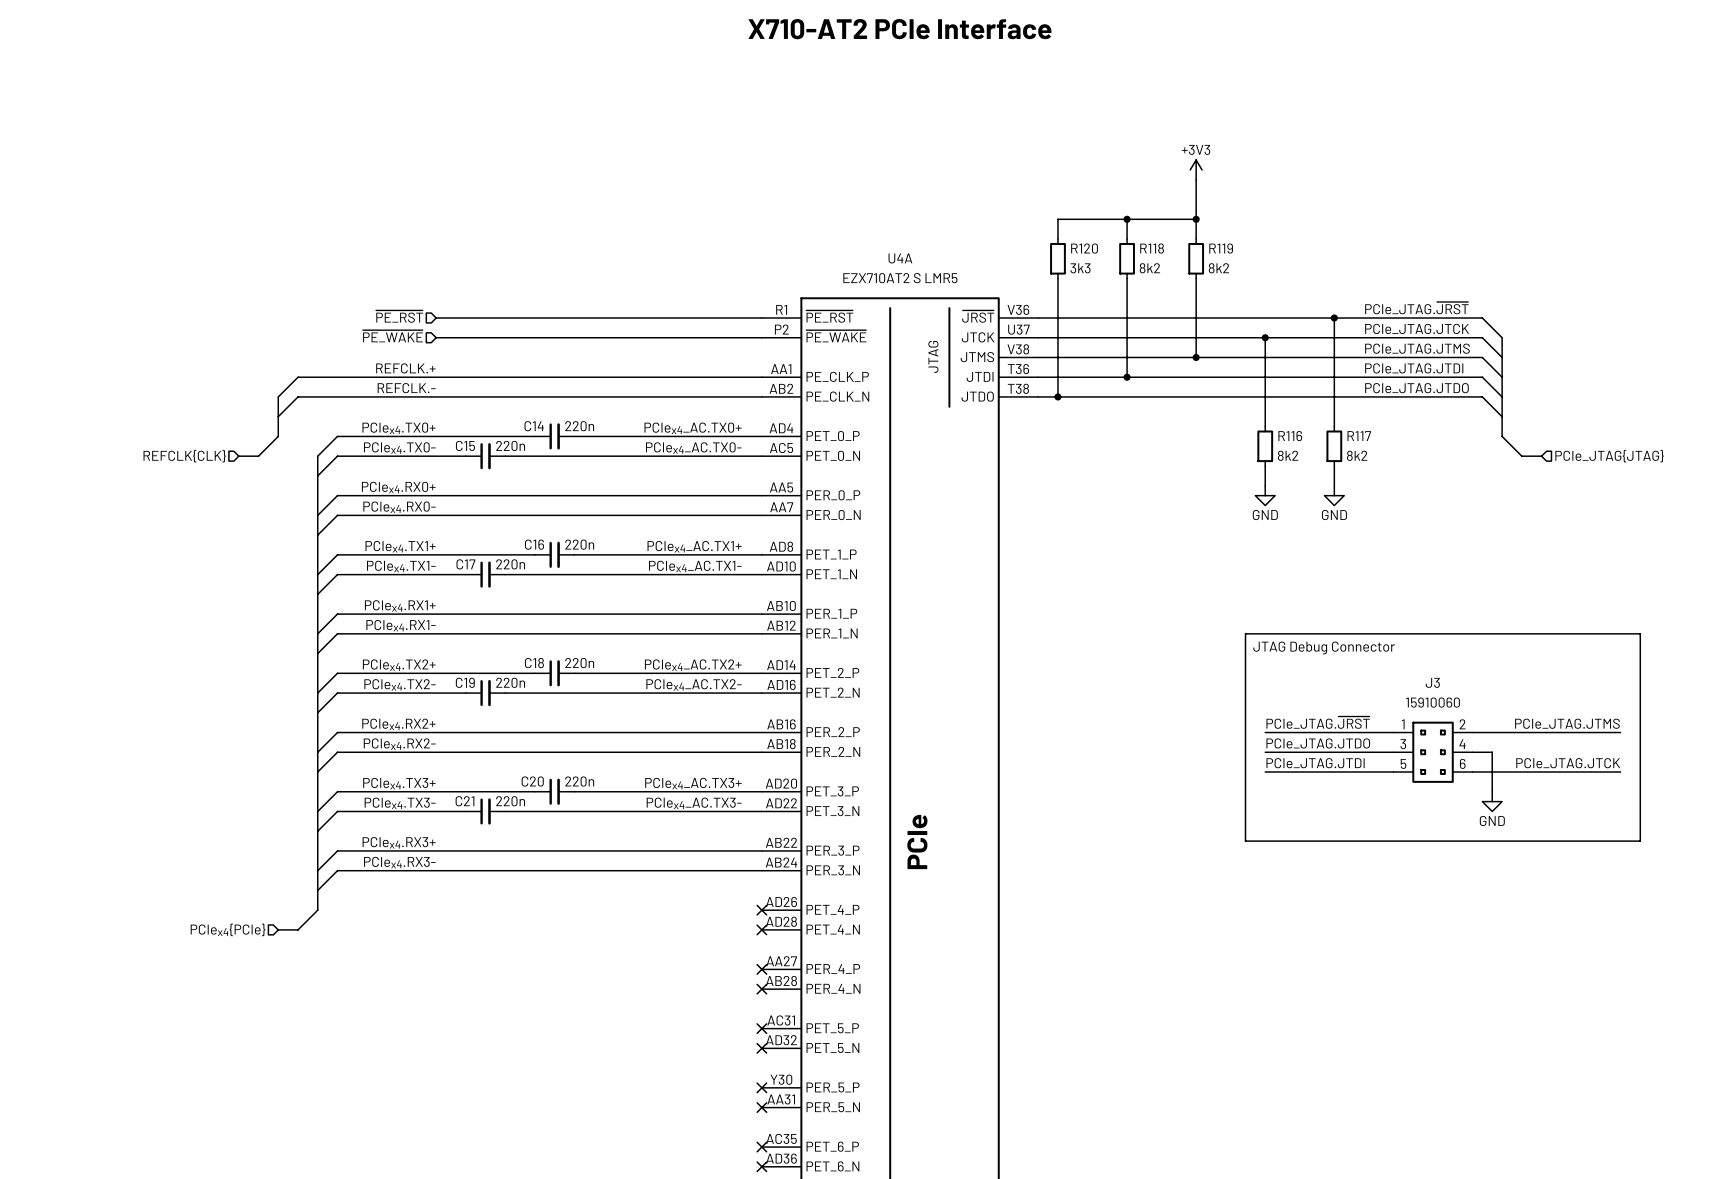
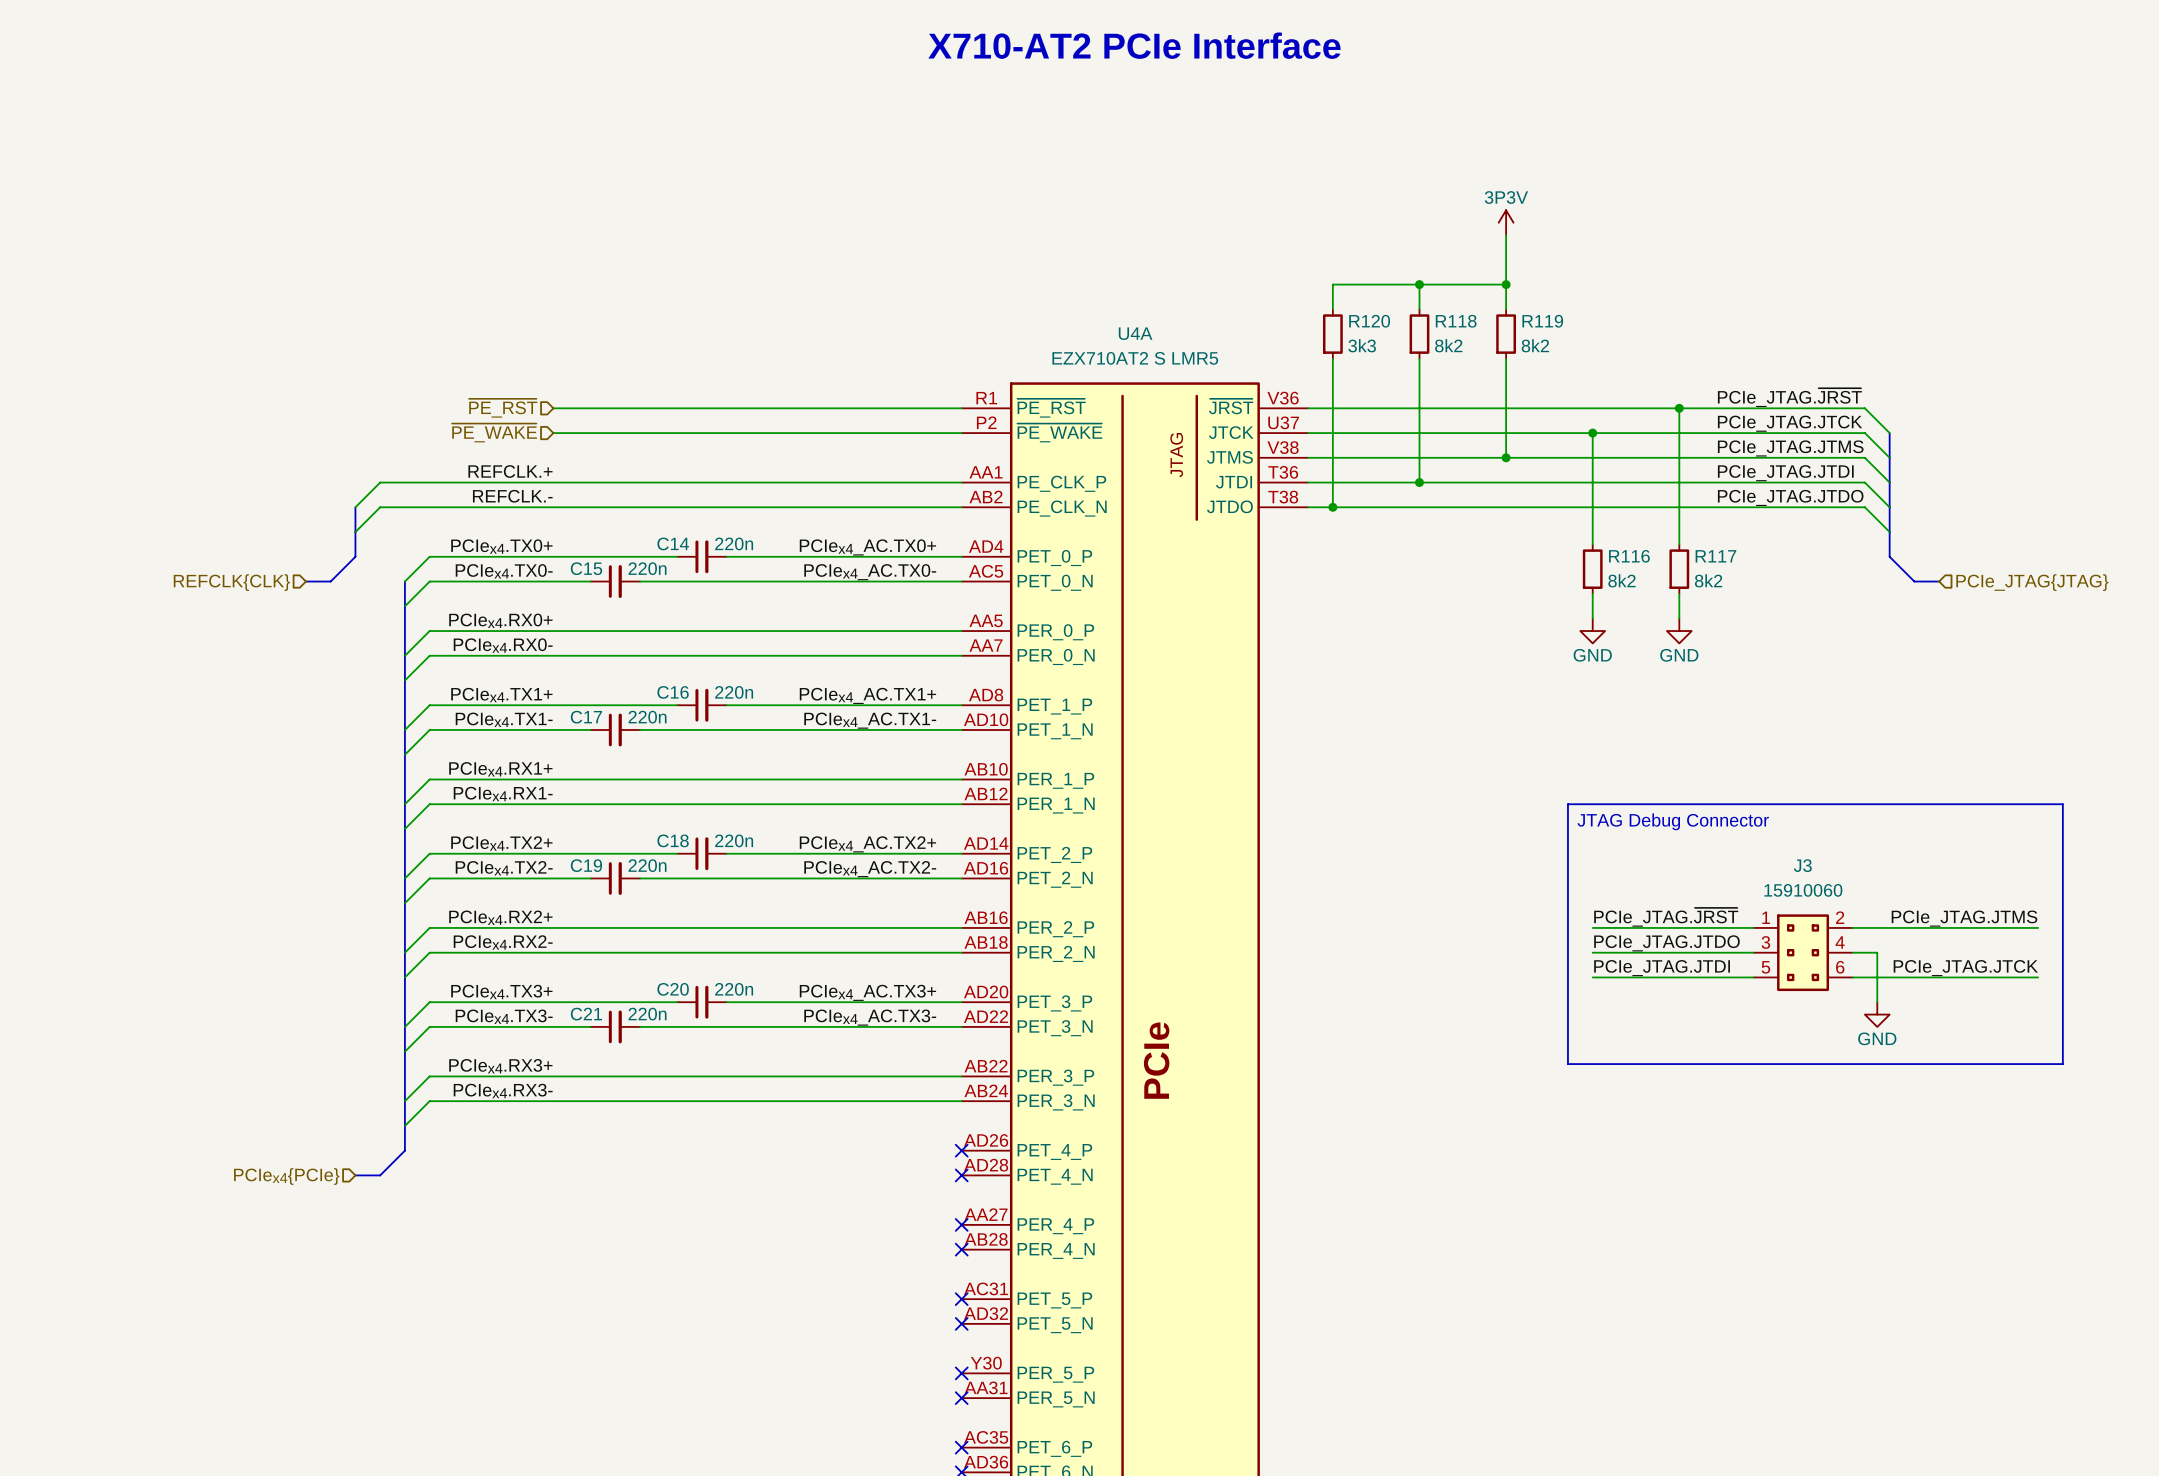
power symbol: +3V3 (1196, 169) -> 3P3V (1506, 222)

